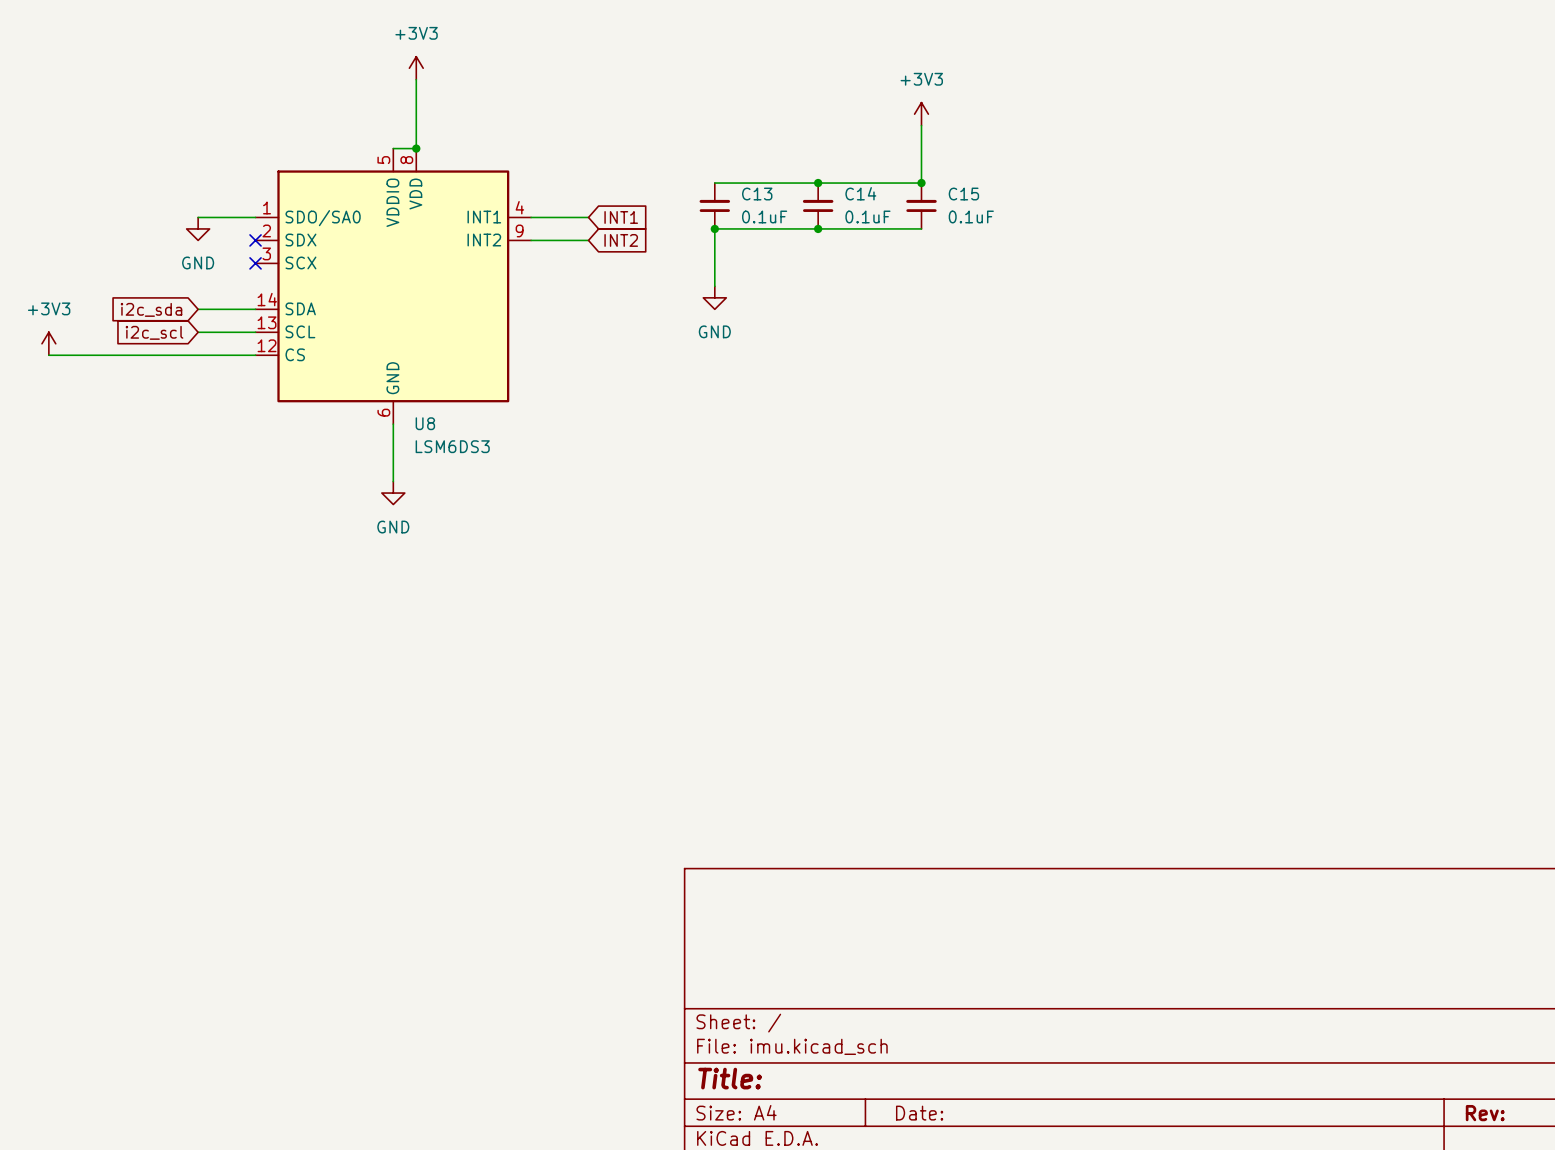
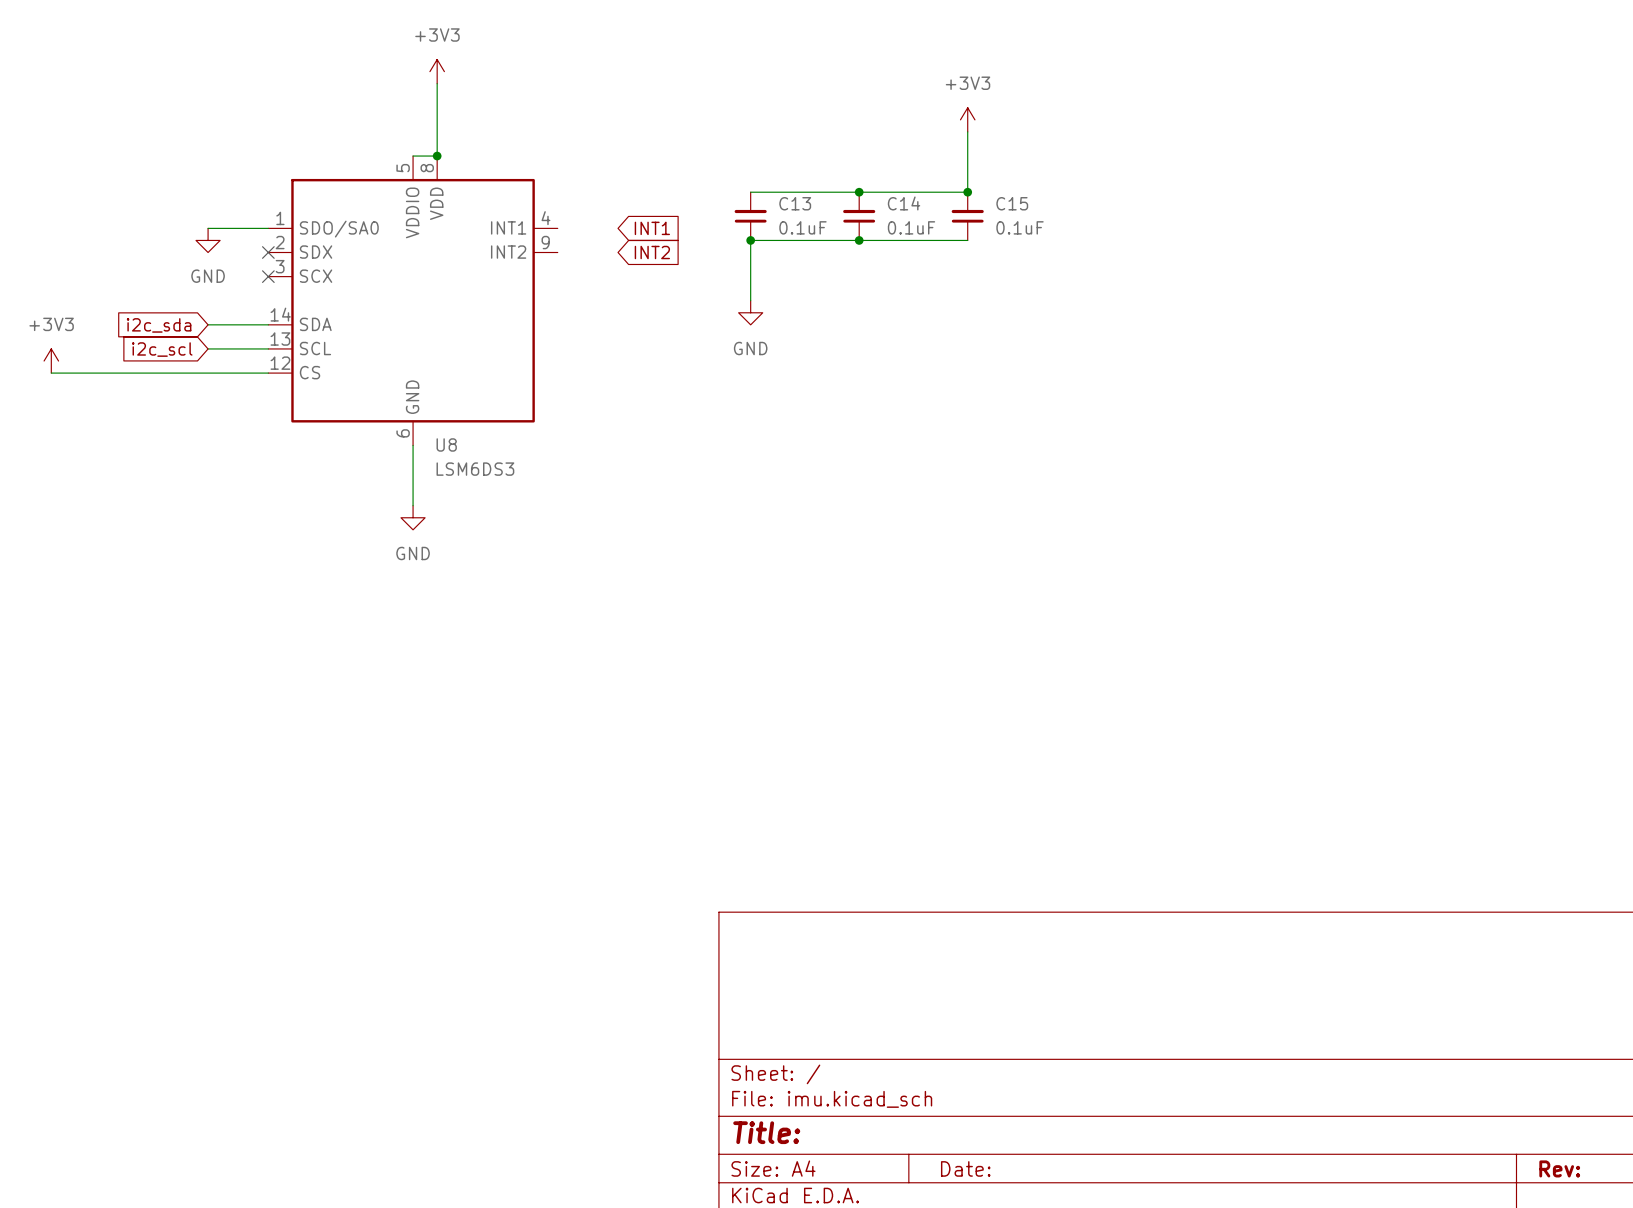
wire: (531, 217) (588, 217) -> none
wire: (531, 240) (588, 240) -> none

